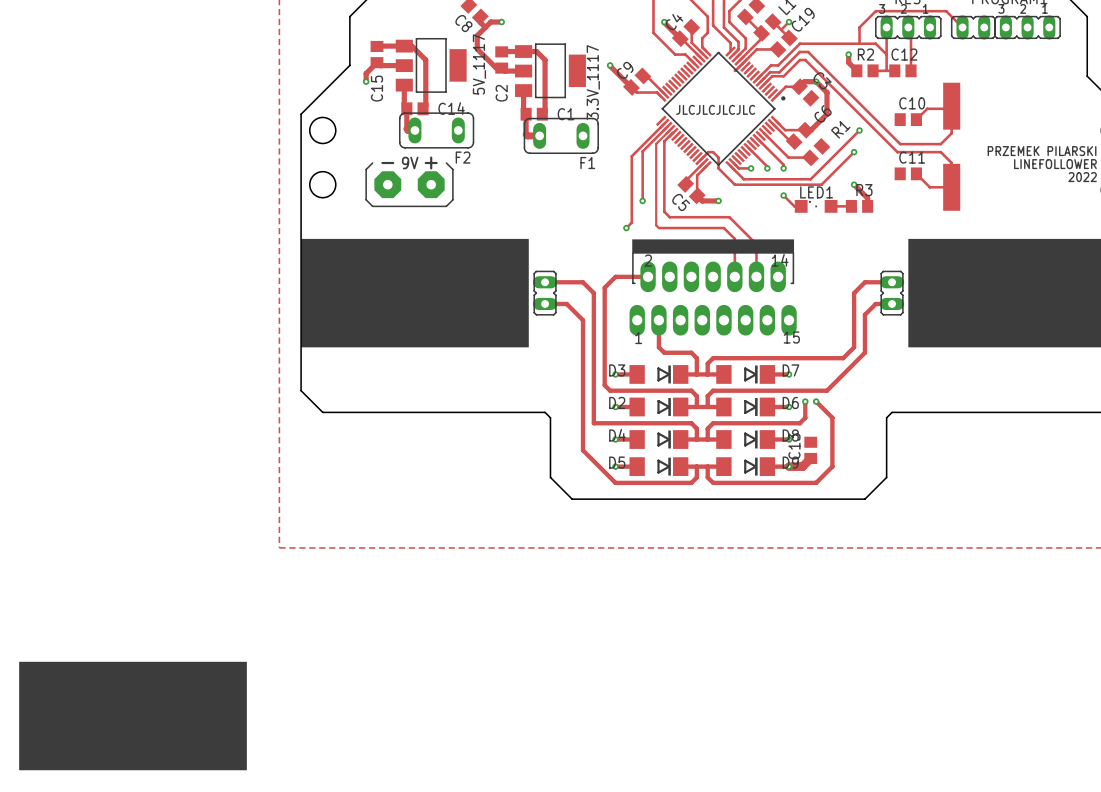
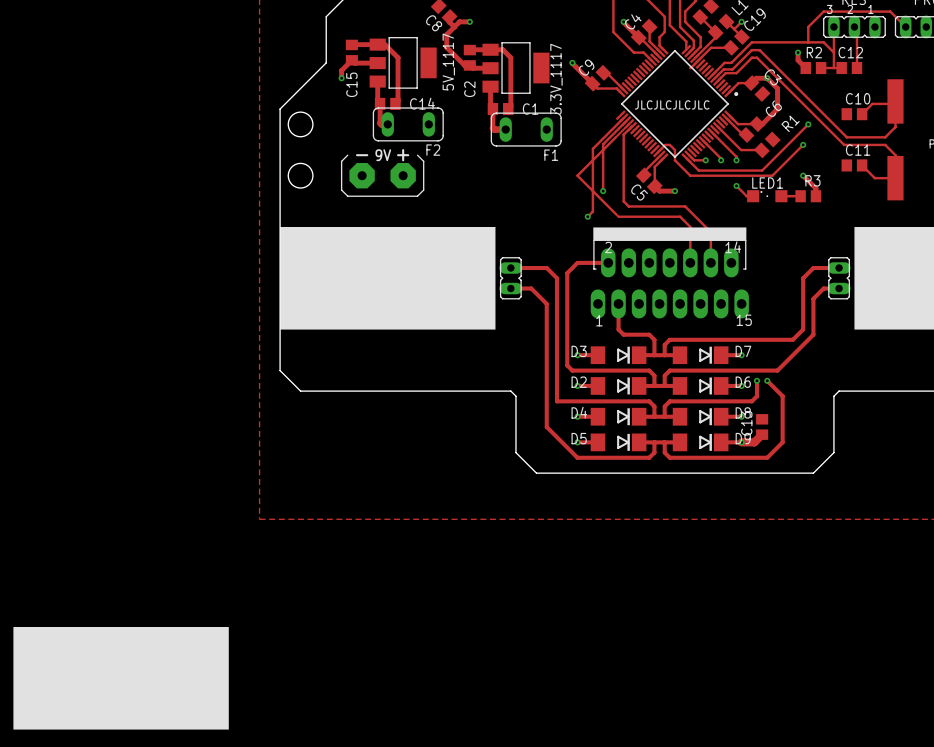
track: (656, 143) (656, 225) -> (615, 137) (577, 175) (615, 214)

